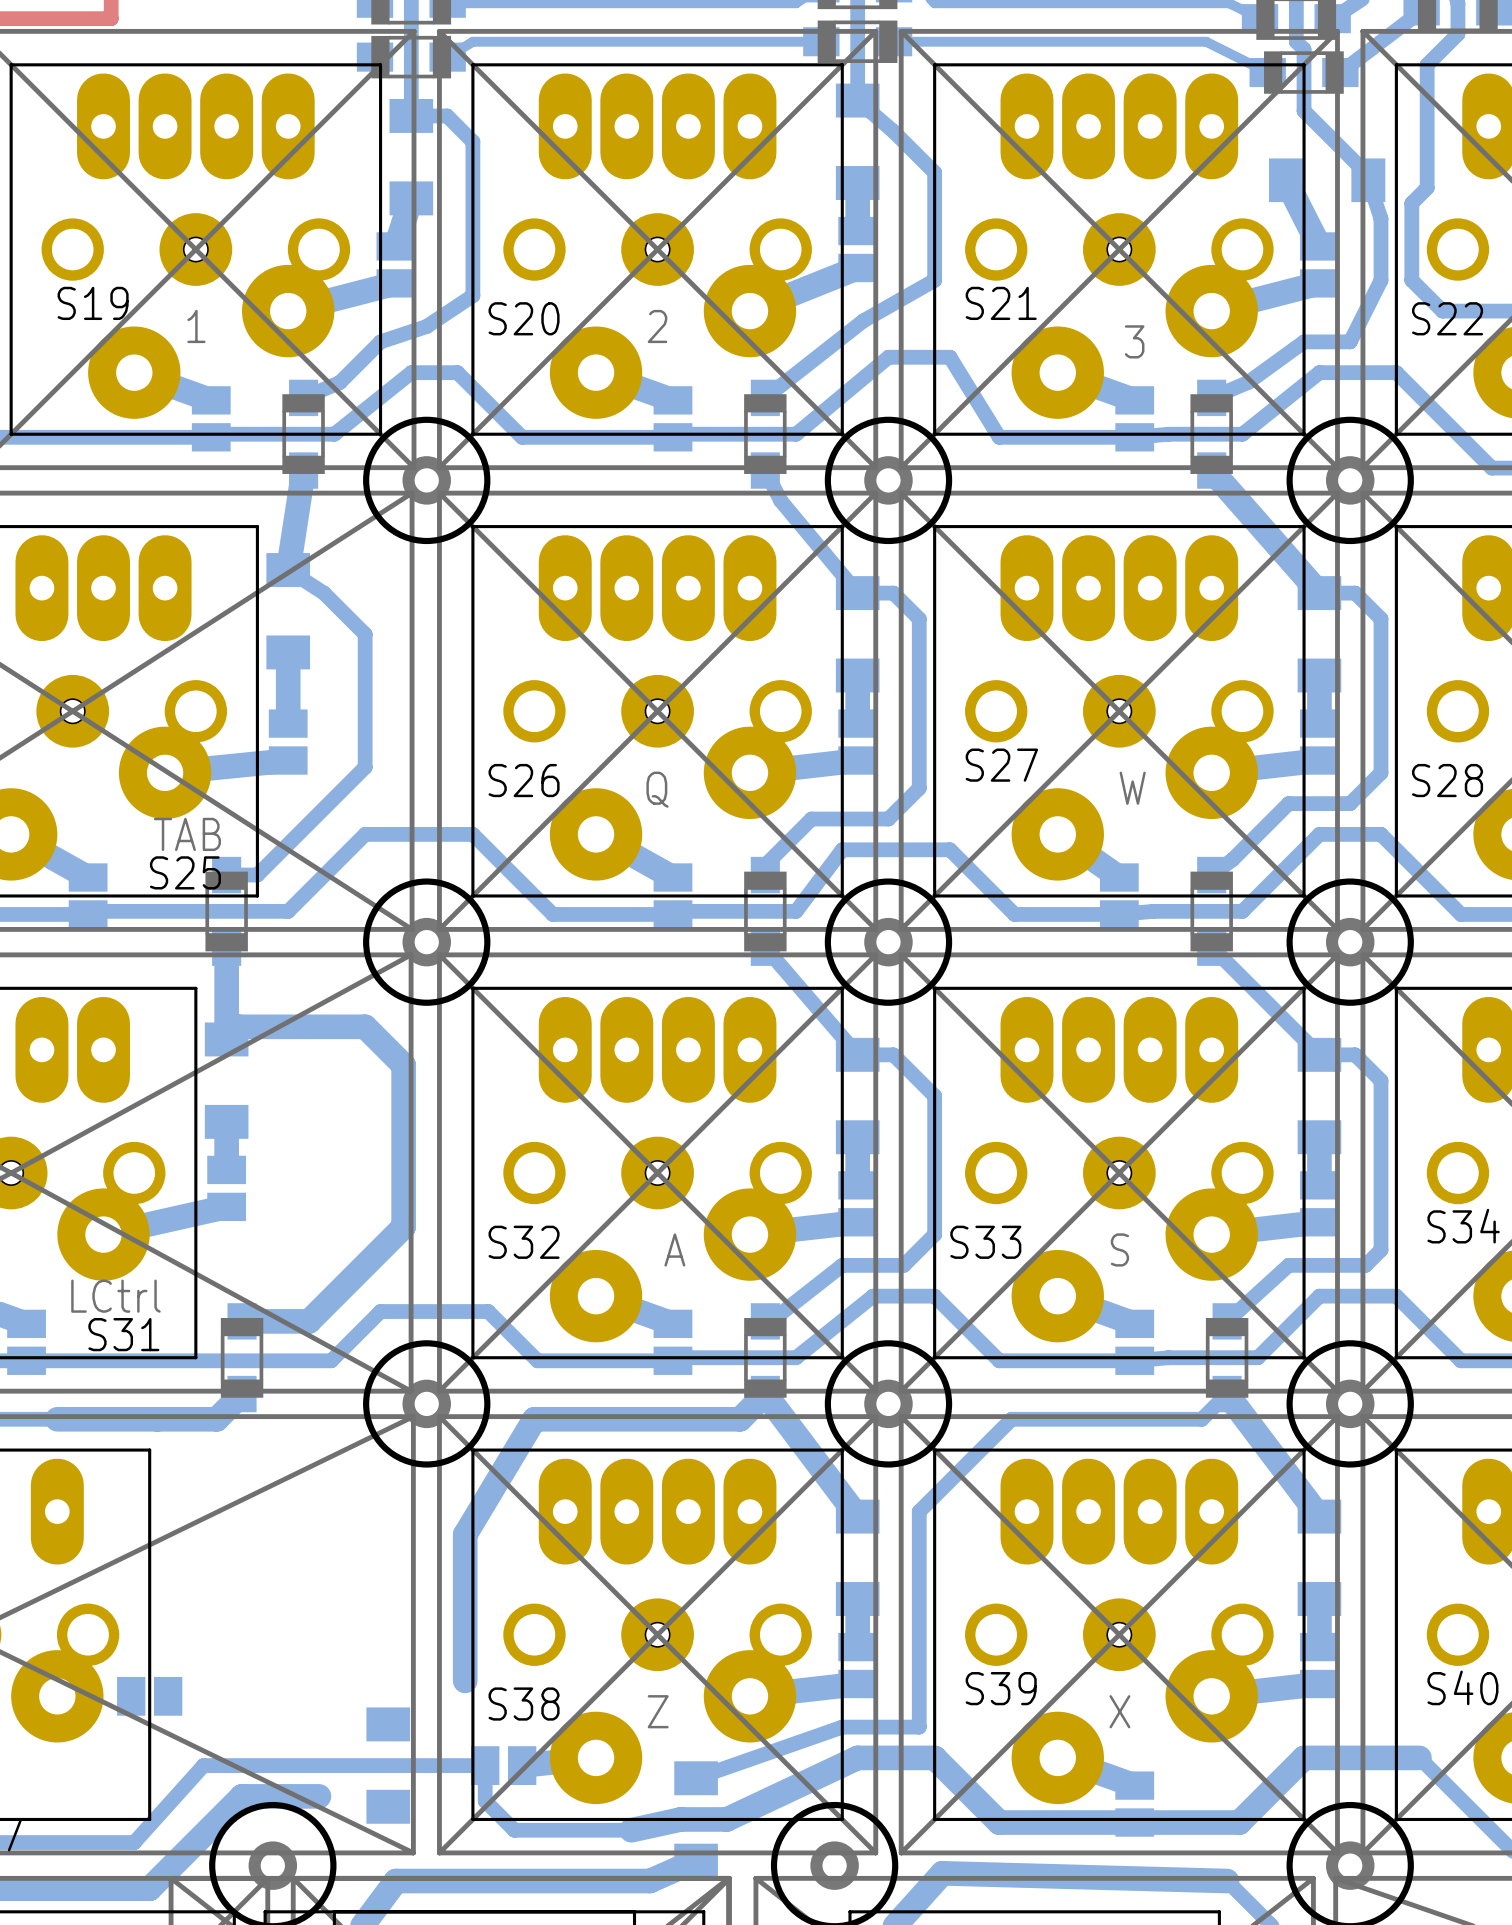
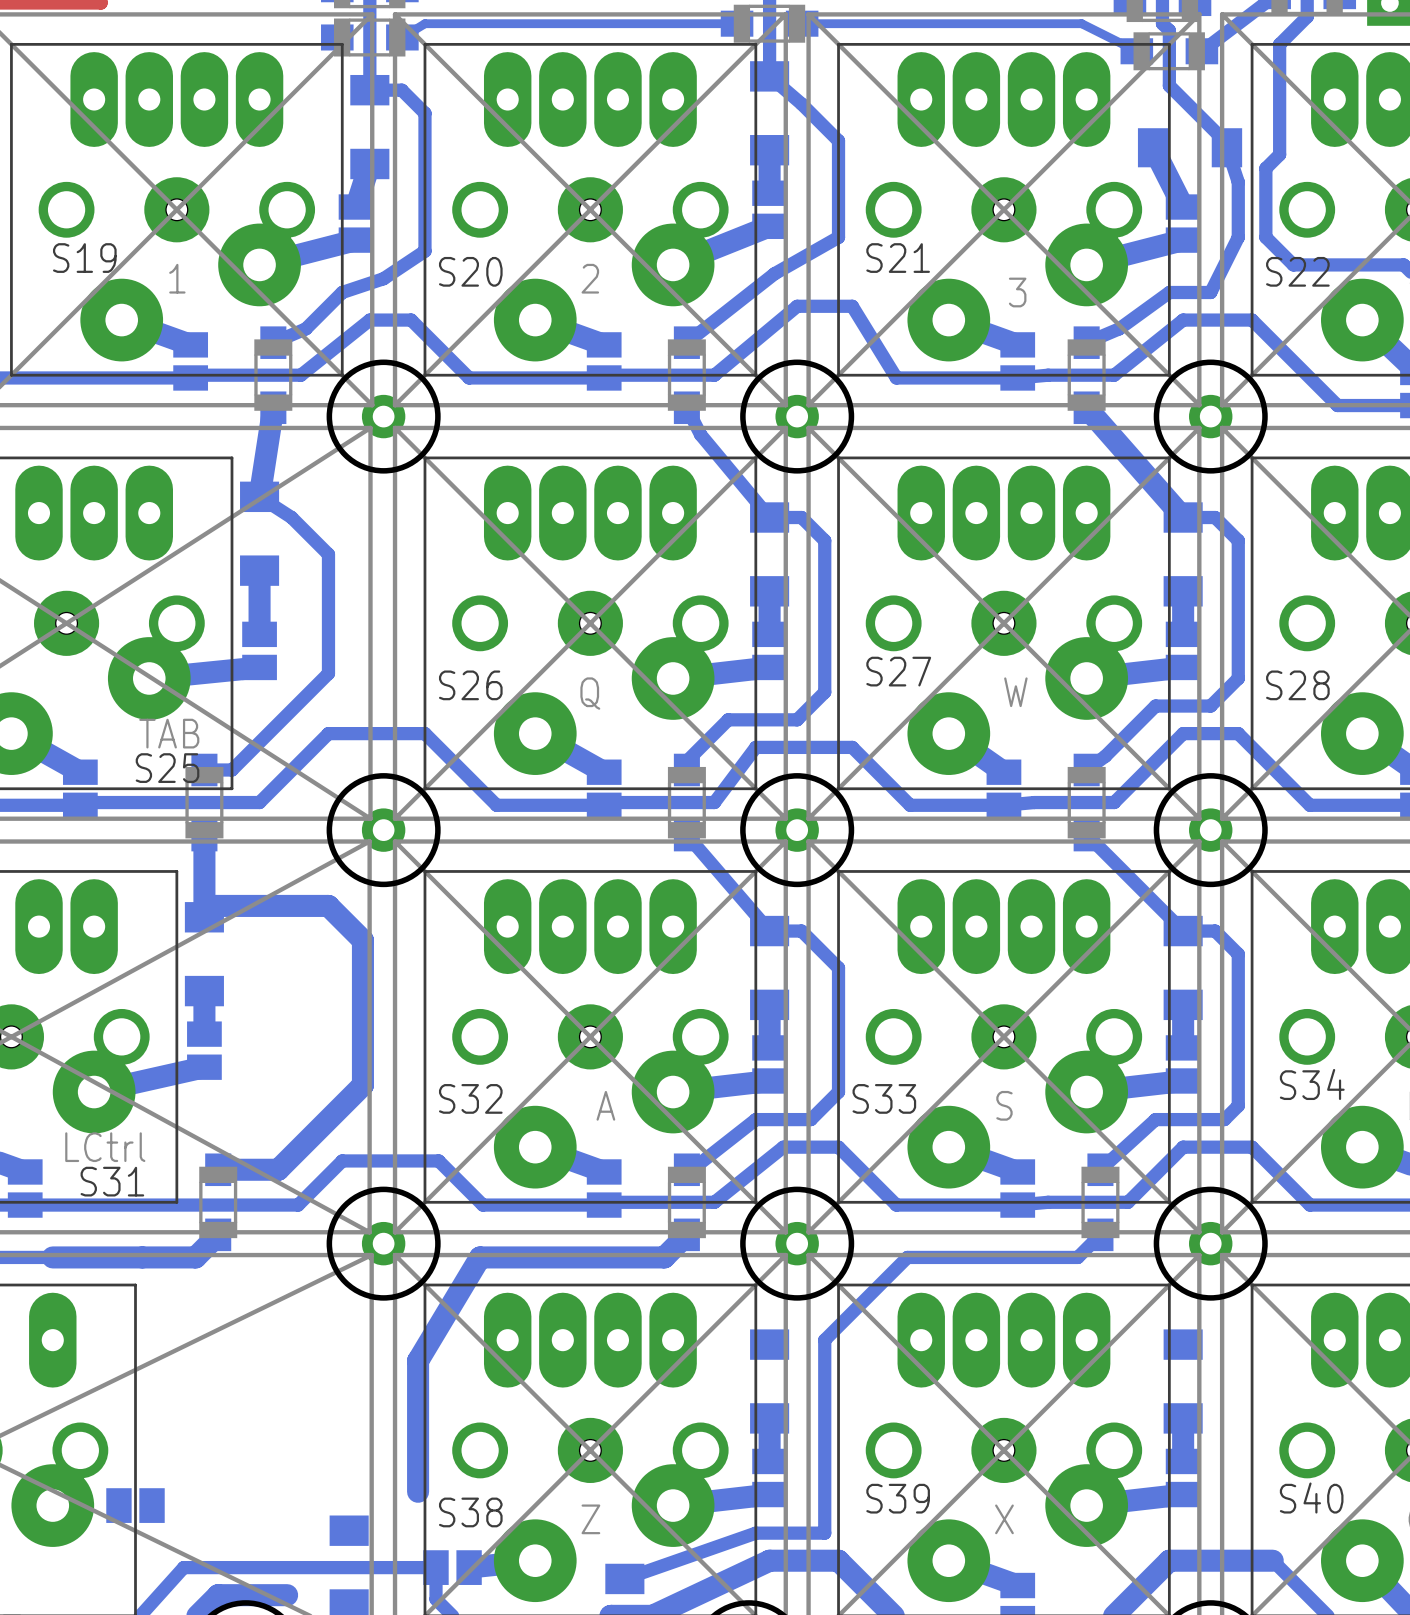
bottom track: (765, 1394) (857, 1516) -> none
bottom track: (1227, 1394) (1319, 1516) -> none

